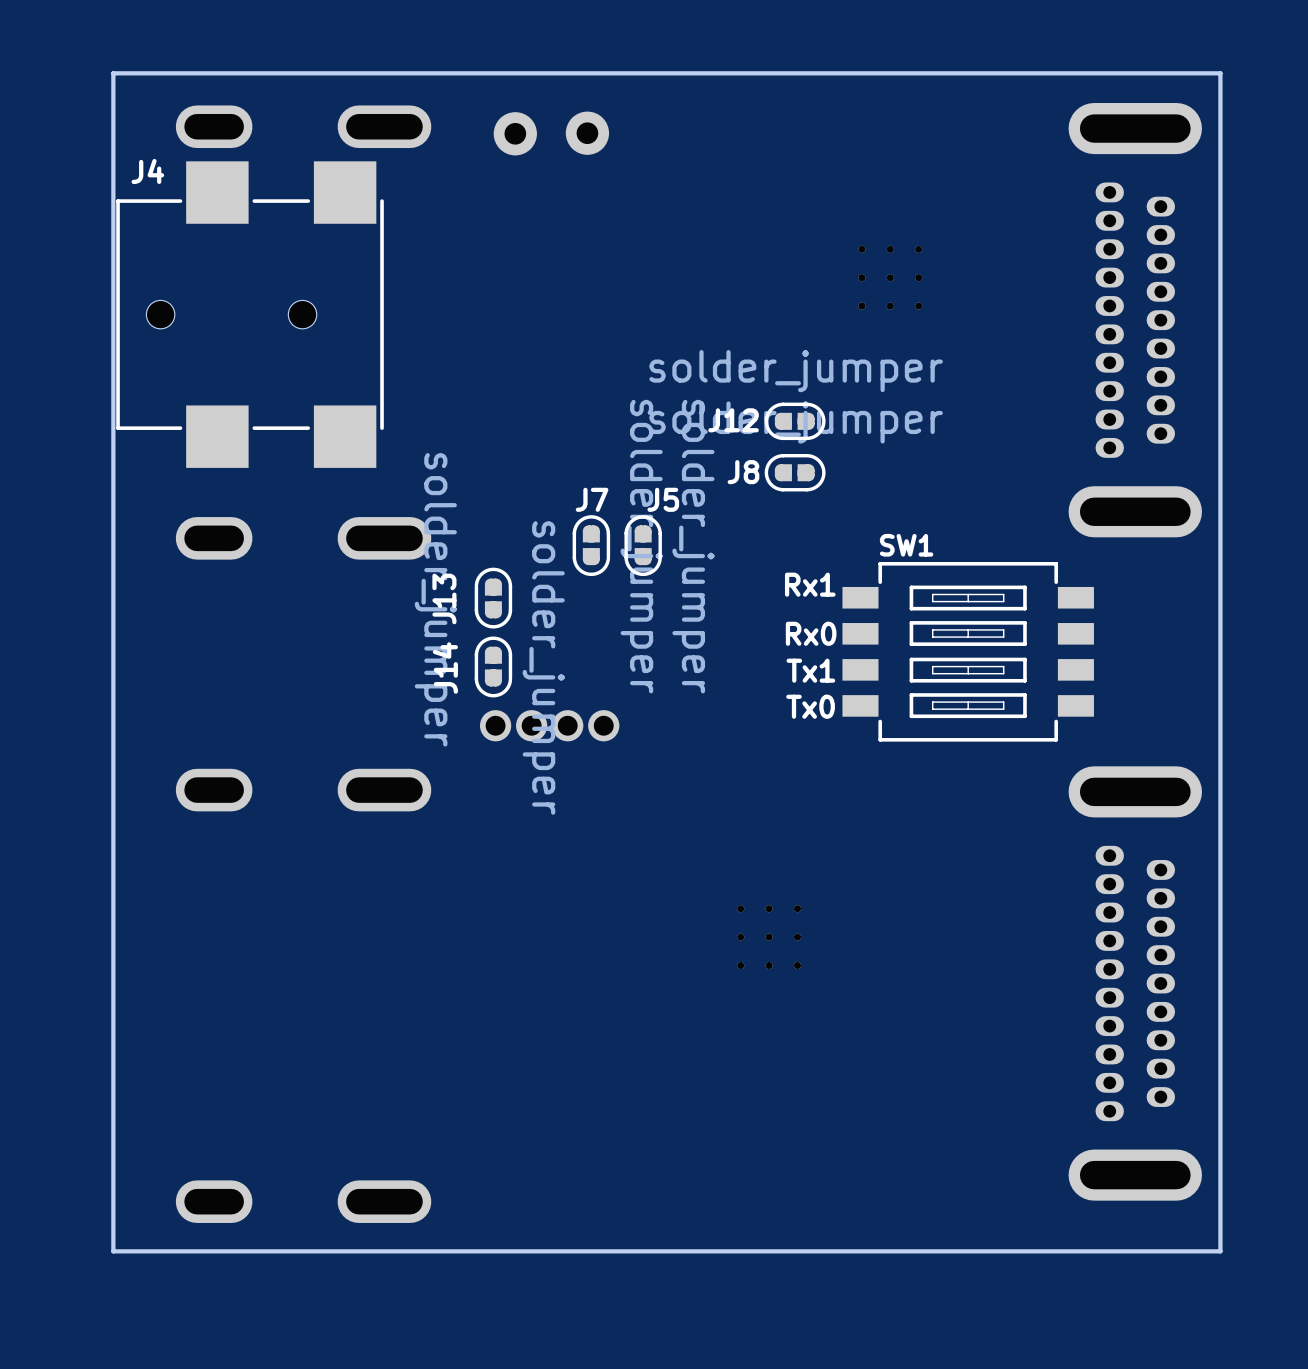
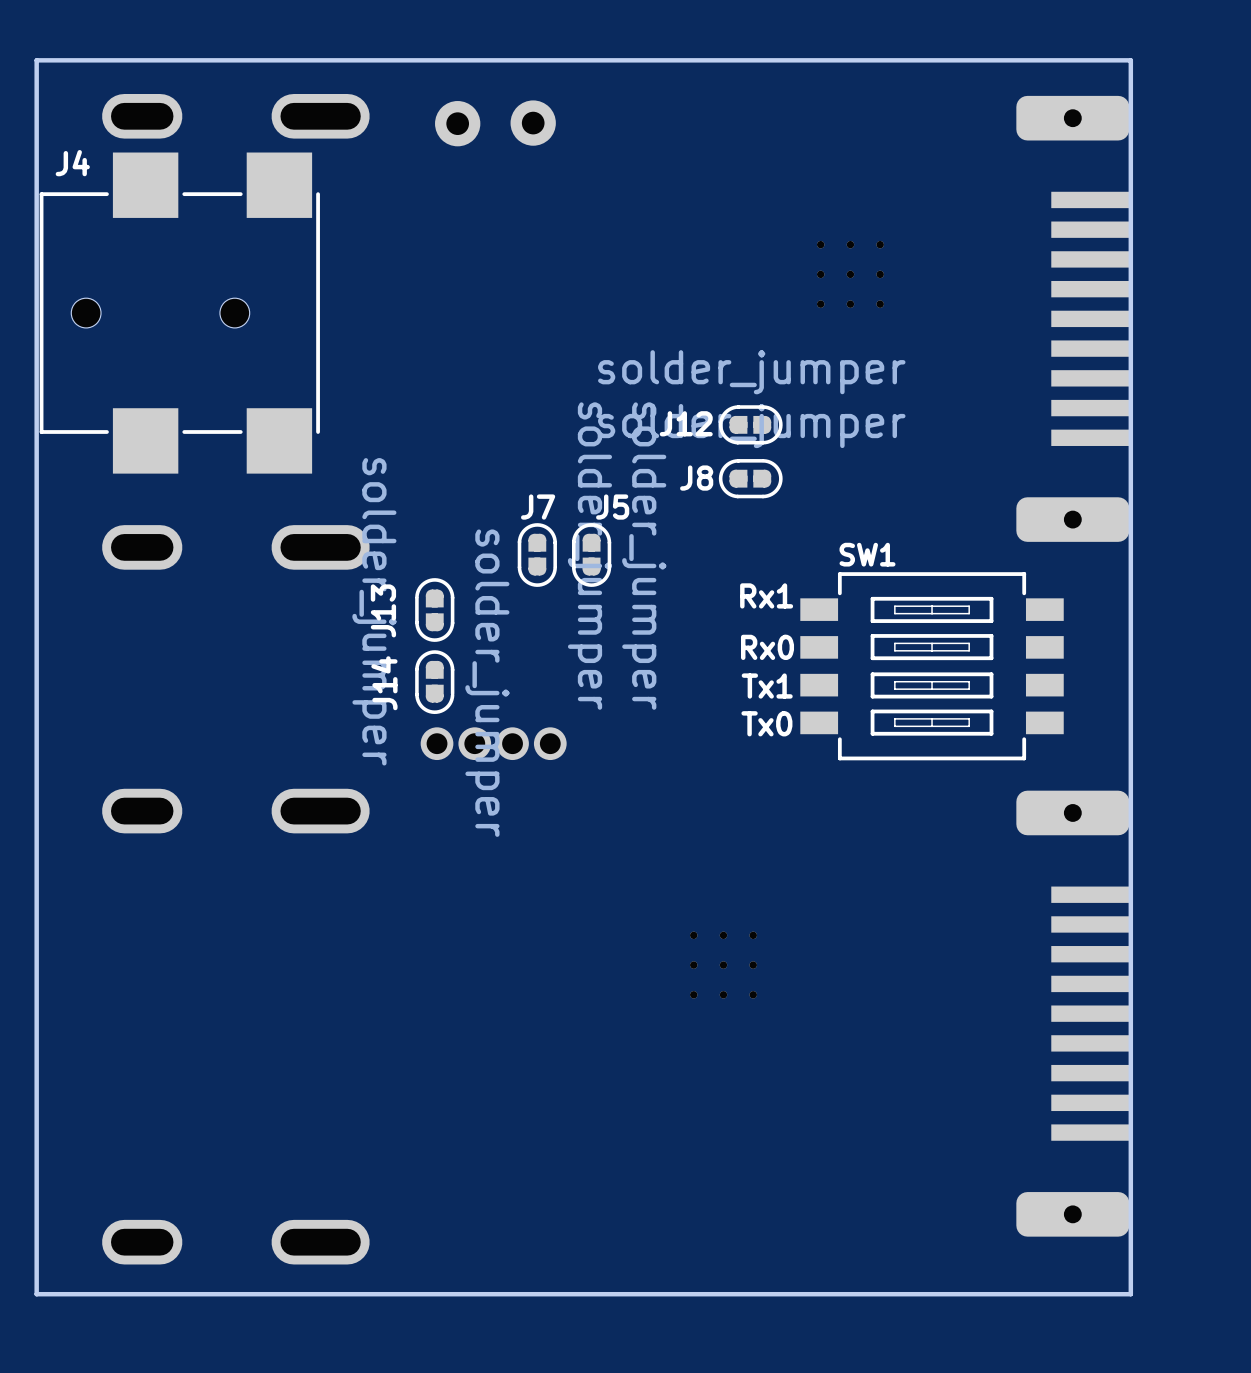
board edge: (1157, 73) (1220, 73) (1220, 1251) (1157, 1251) -> (1130, 60) (1130, 1294)
part: none -> (1073, 318)
part: (1135, 320) -> none
part: none -> (1073, 1013)
part: (1135, 983) -> none

